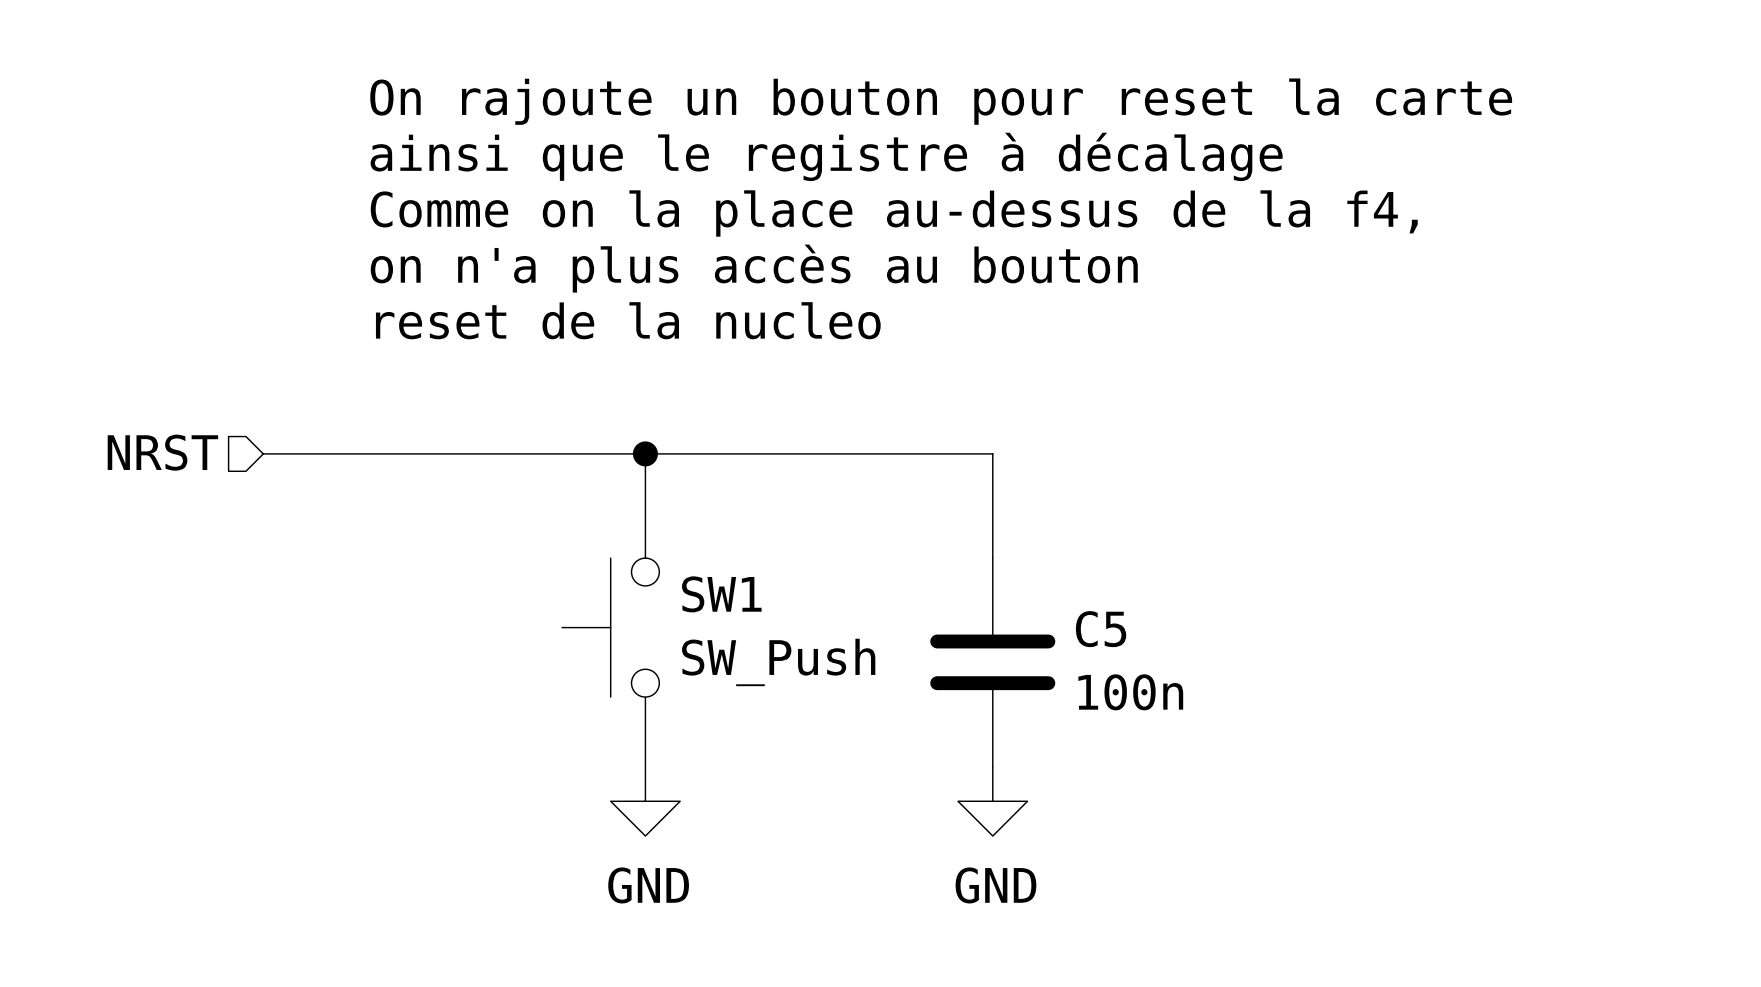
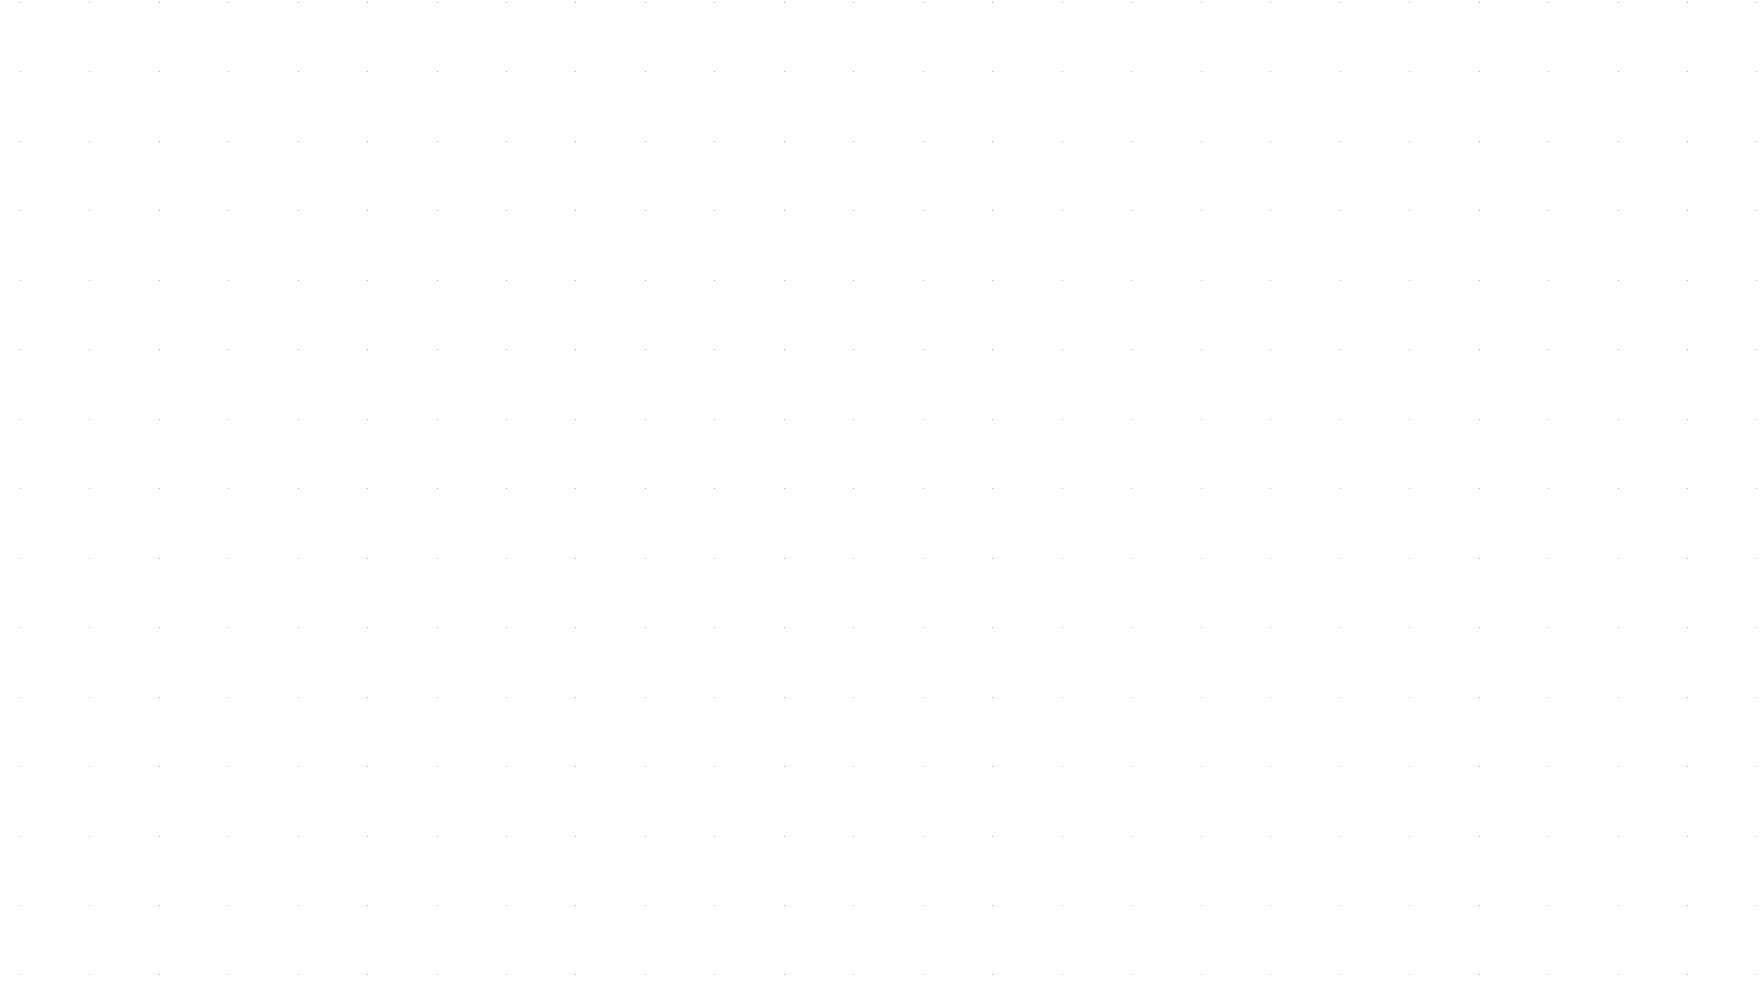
text: On rajoute un bouton pour reset la carte (941, 101) -> none
text: ainsi que le registre à décalage (826, 156) -> none
text: Comme on la place au-dessus de la f4, (894, 213) -> none
text: on n'a plus accès au bouton (754, 268) -> none
text: reset de la nucleo (628, 320) -> none
hierarchical label: NRST (162, 452) -> none
wire: (263, 453) (992, 453) (992, 558) -> none
wire: (645, 453) (645, 488) -> none
junction: (645, 453) -> none
SW1: SW_Push (610, 627) -> none
C5: 100n (992, 662) -> none
power symbol: GND (645, 801) -> none
power symbol: GND (992, 801) -> none

